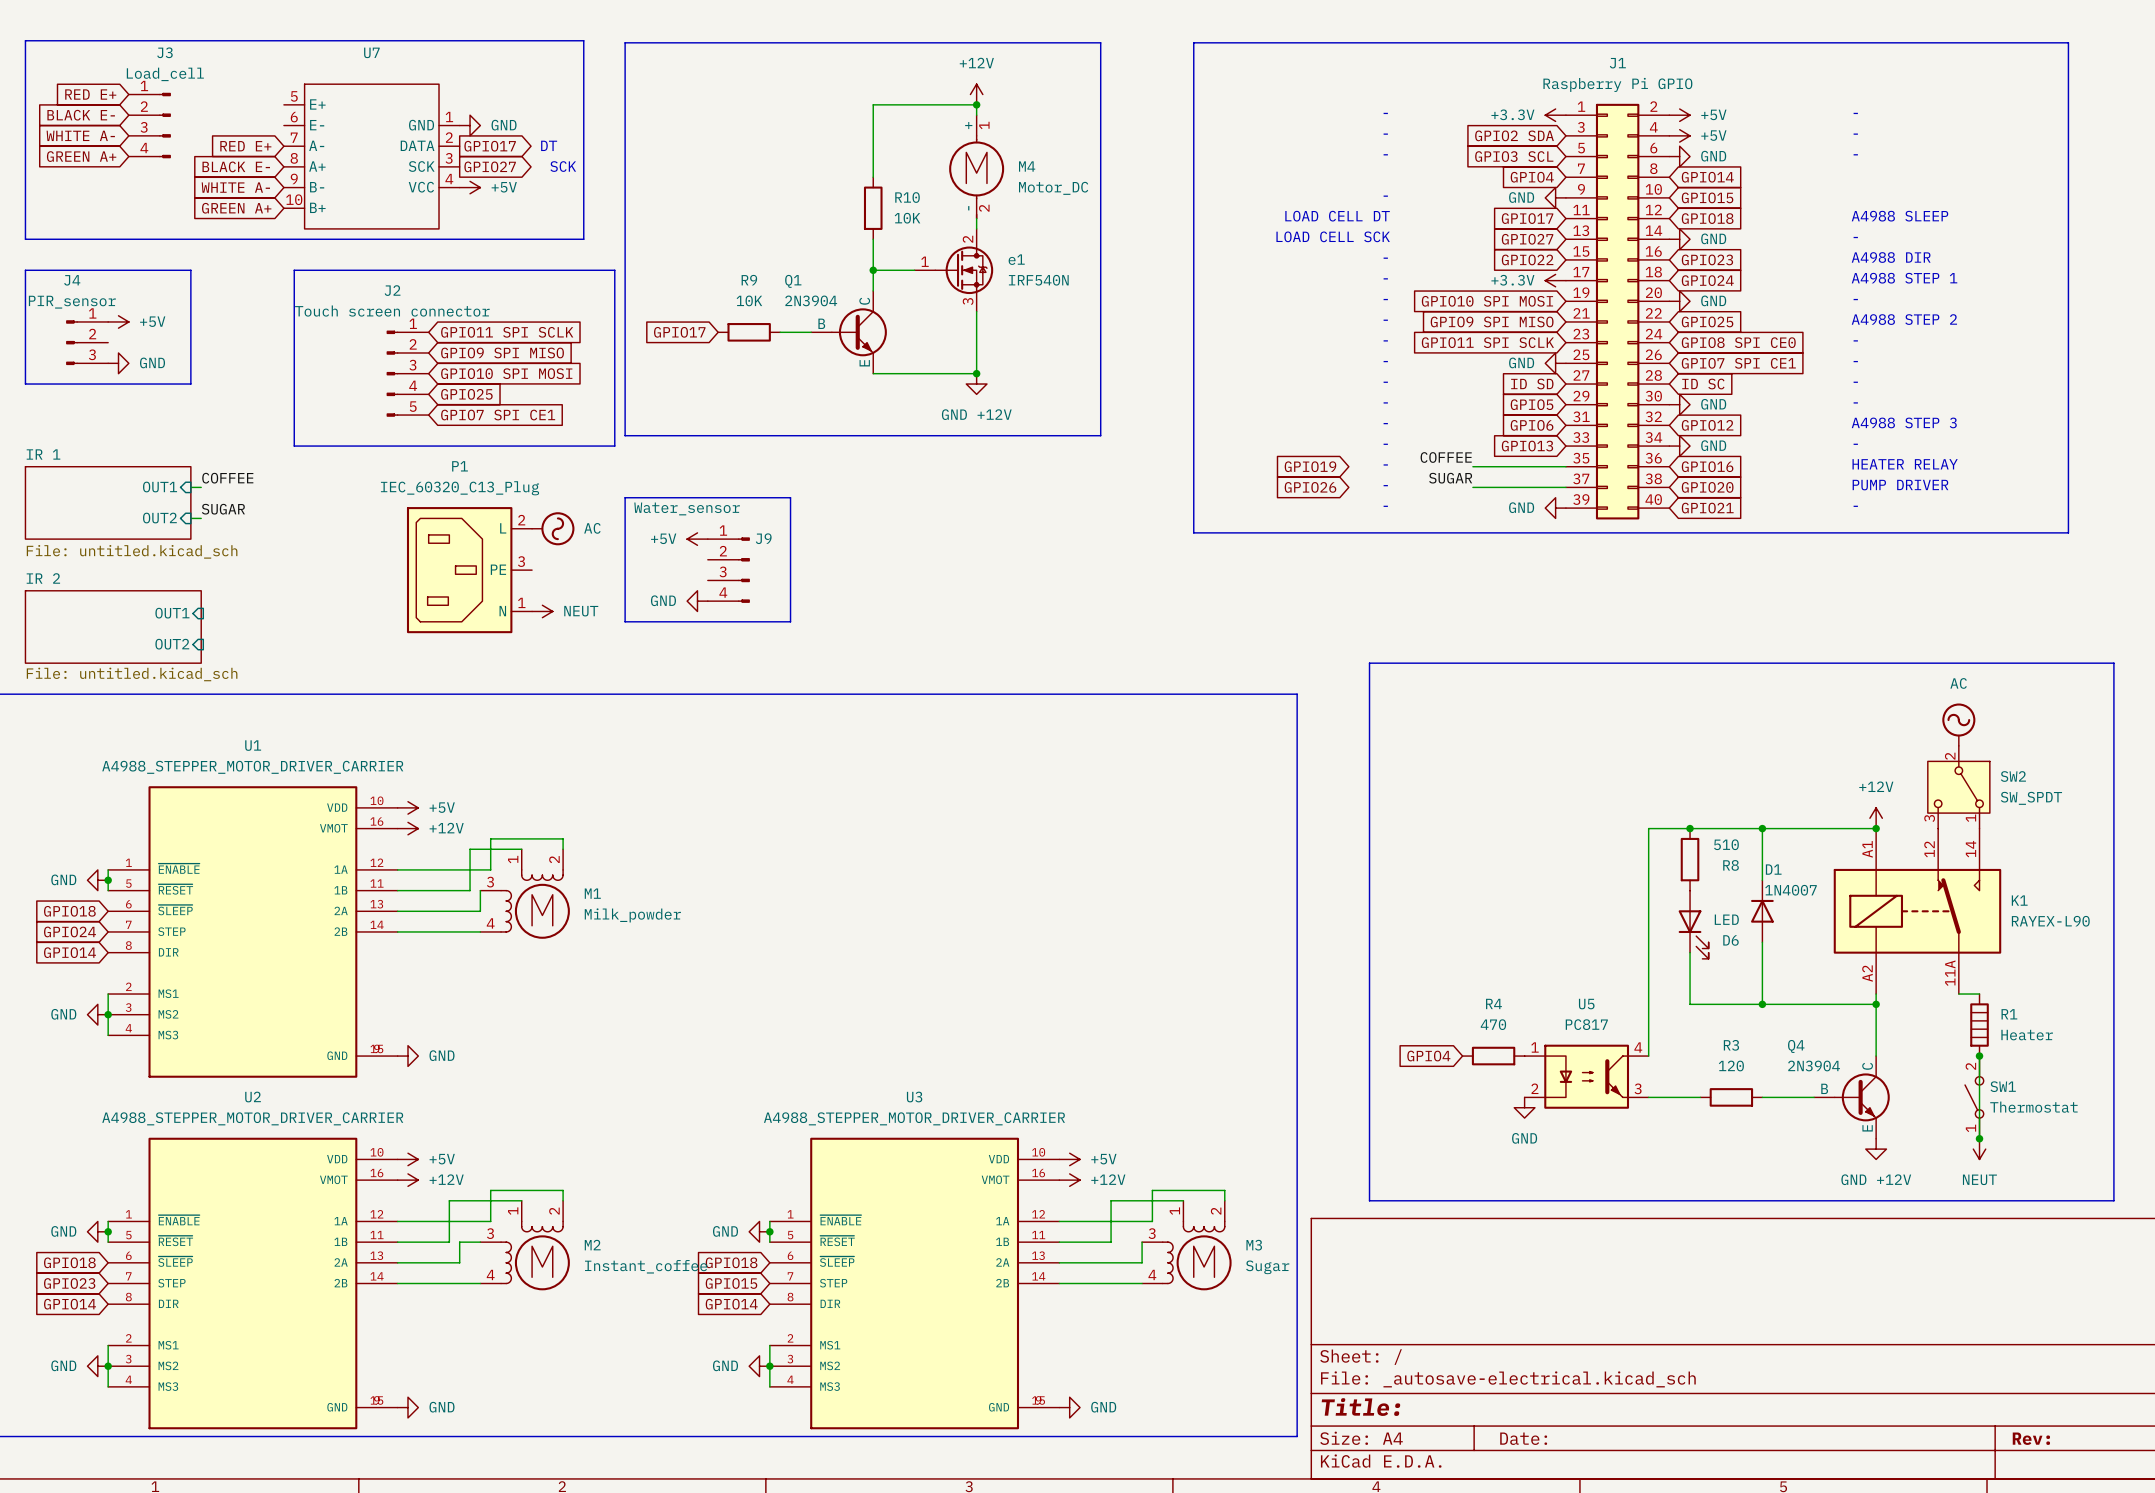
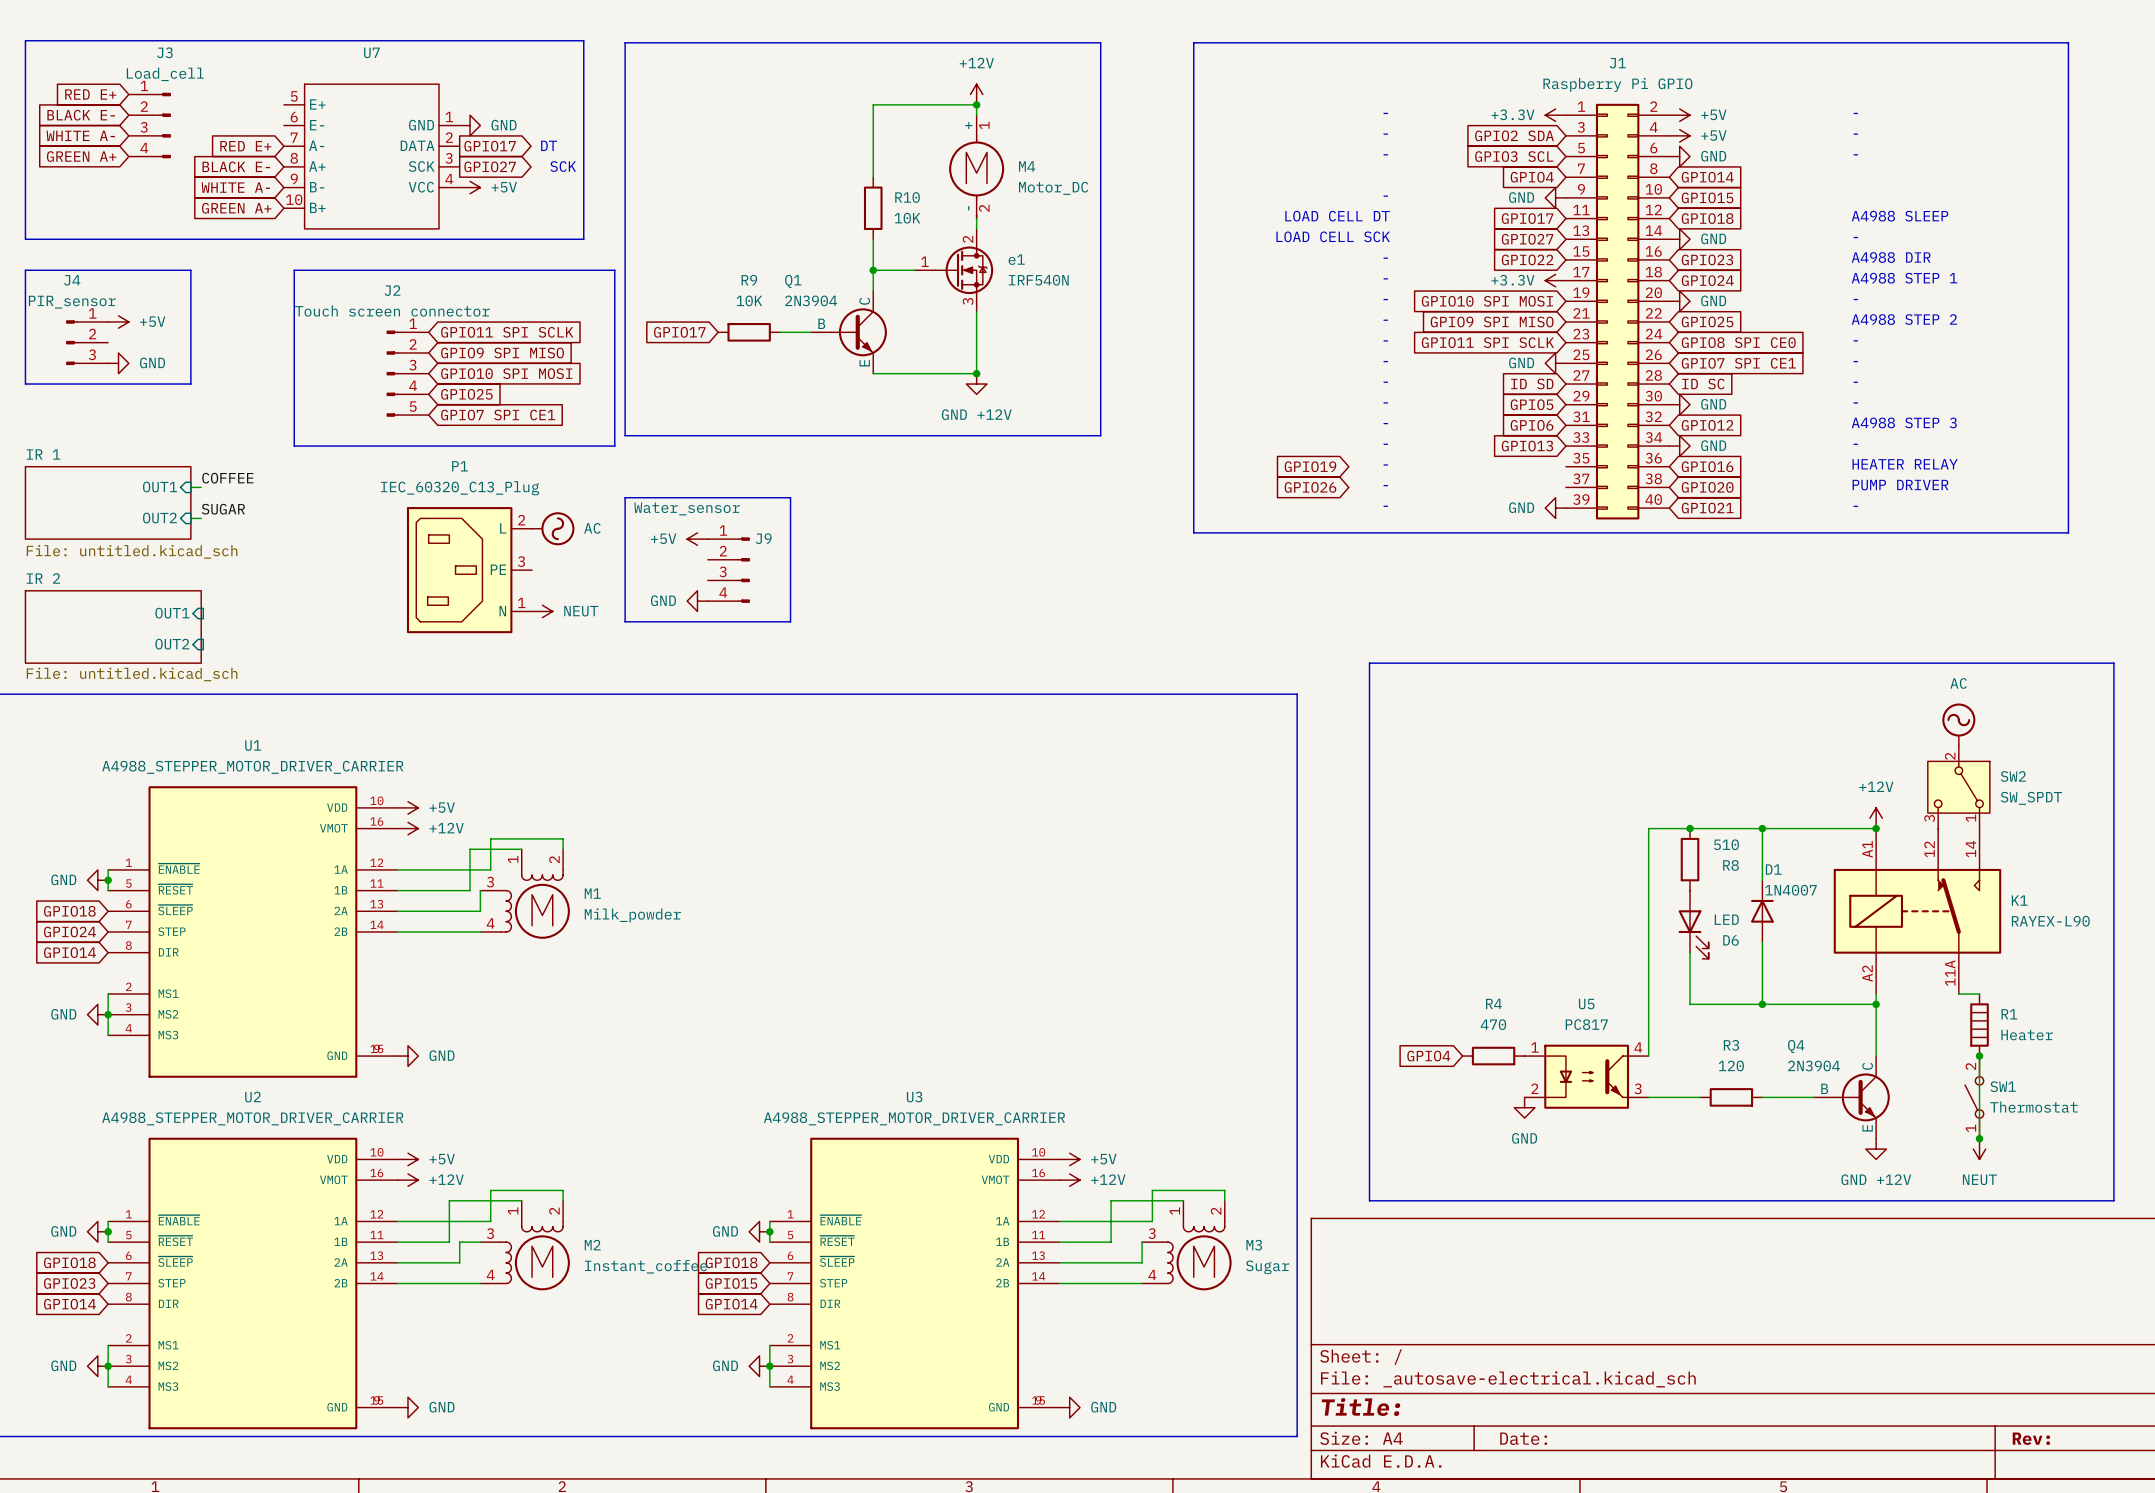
label: COFFEE (1446, 457) -> none
wire: (1472, 466) (1565, 466) -> none
label: SUGAR (1450, 478) -> none
wire: (1472, 487) (1565, 487) -> none

